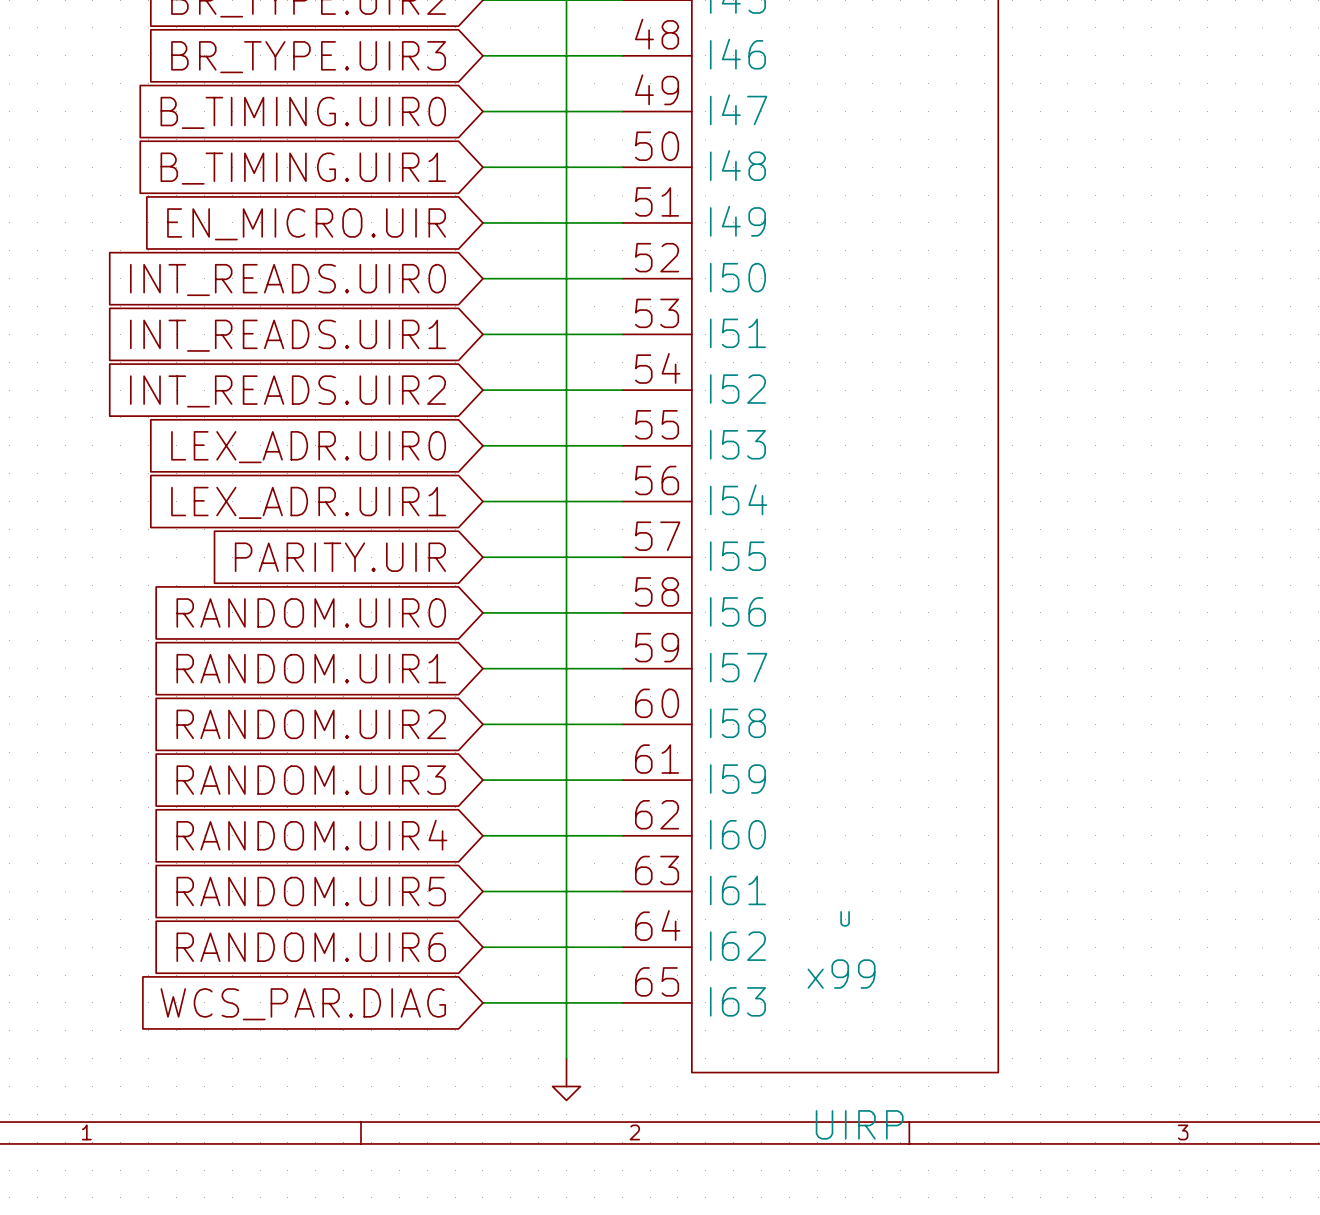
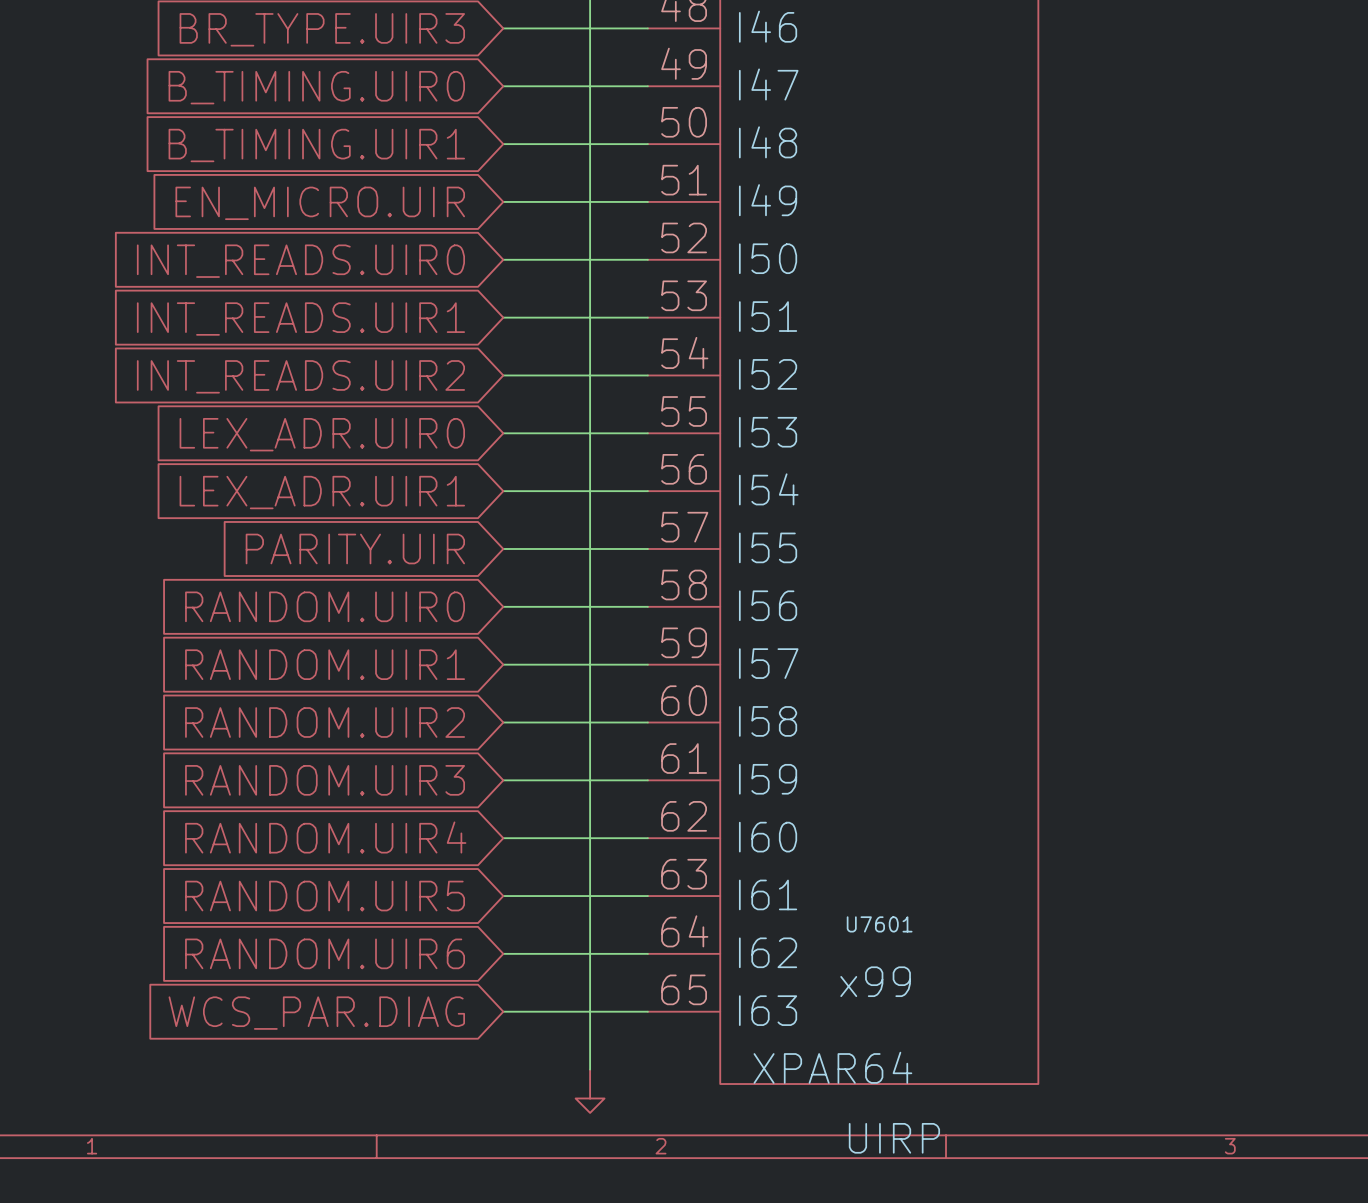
U name: U (845, 918) -> U7601 (879, 924)
U value: none -> XPAR64 (832, 1067)

